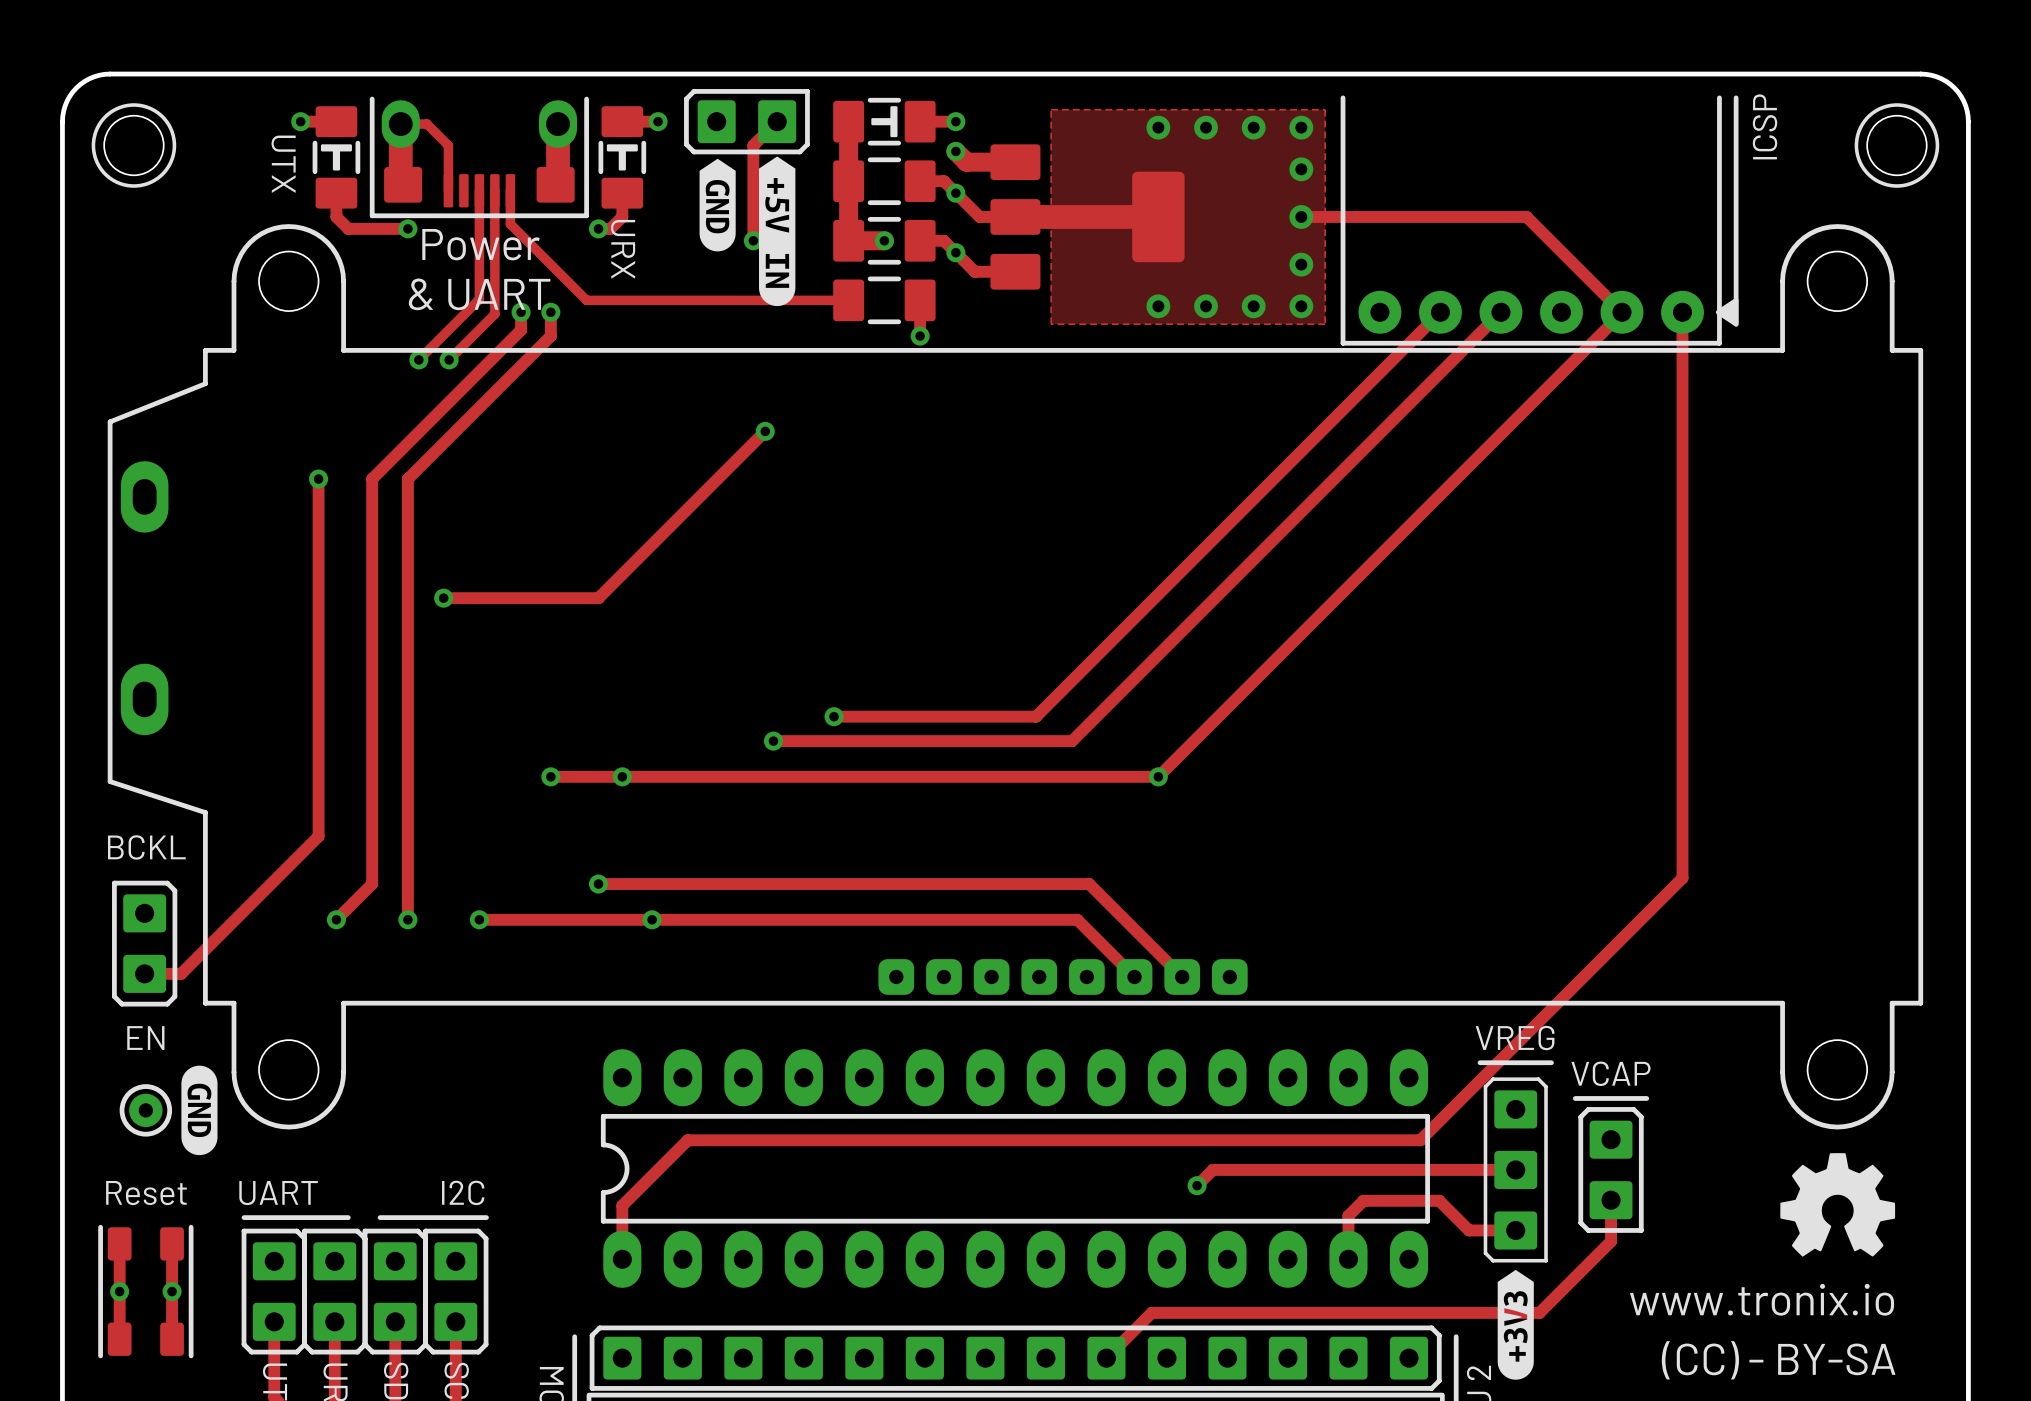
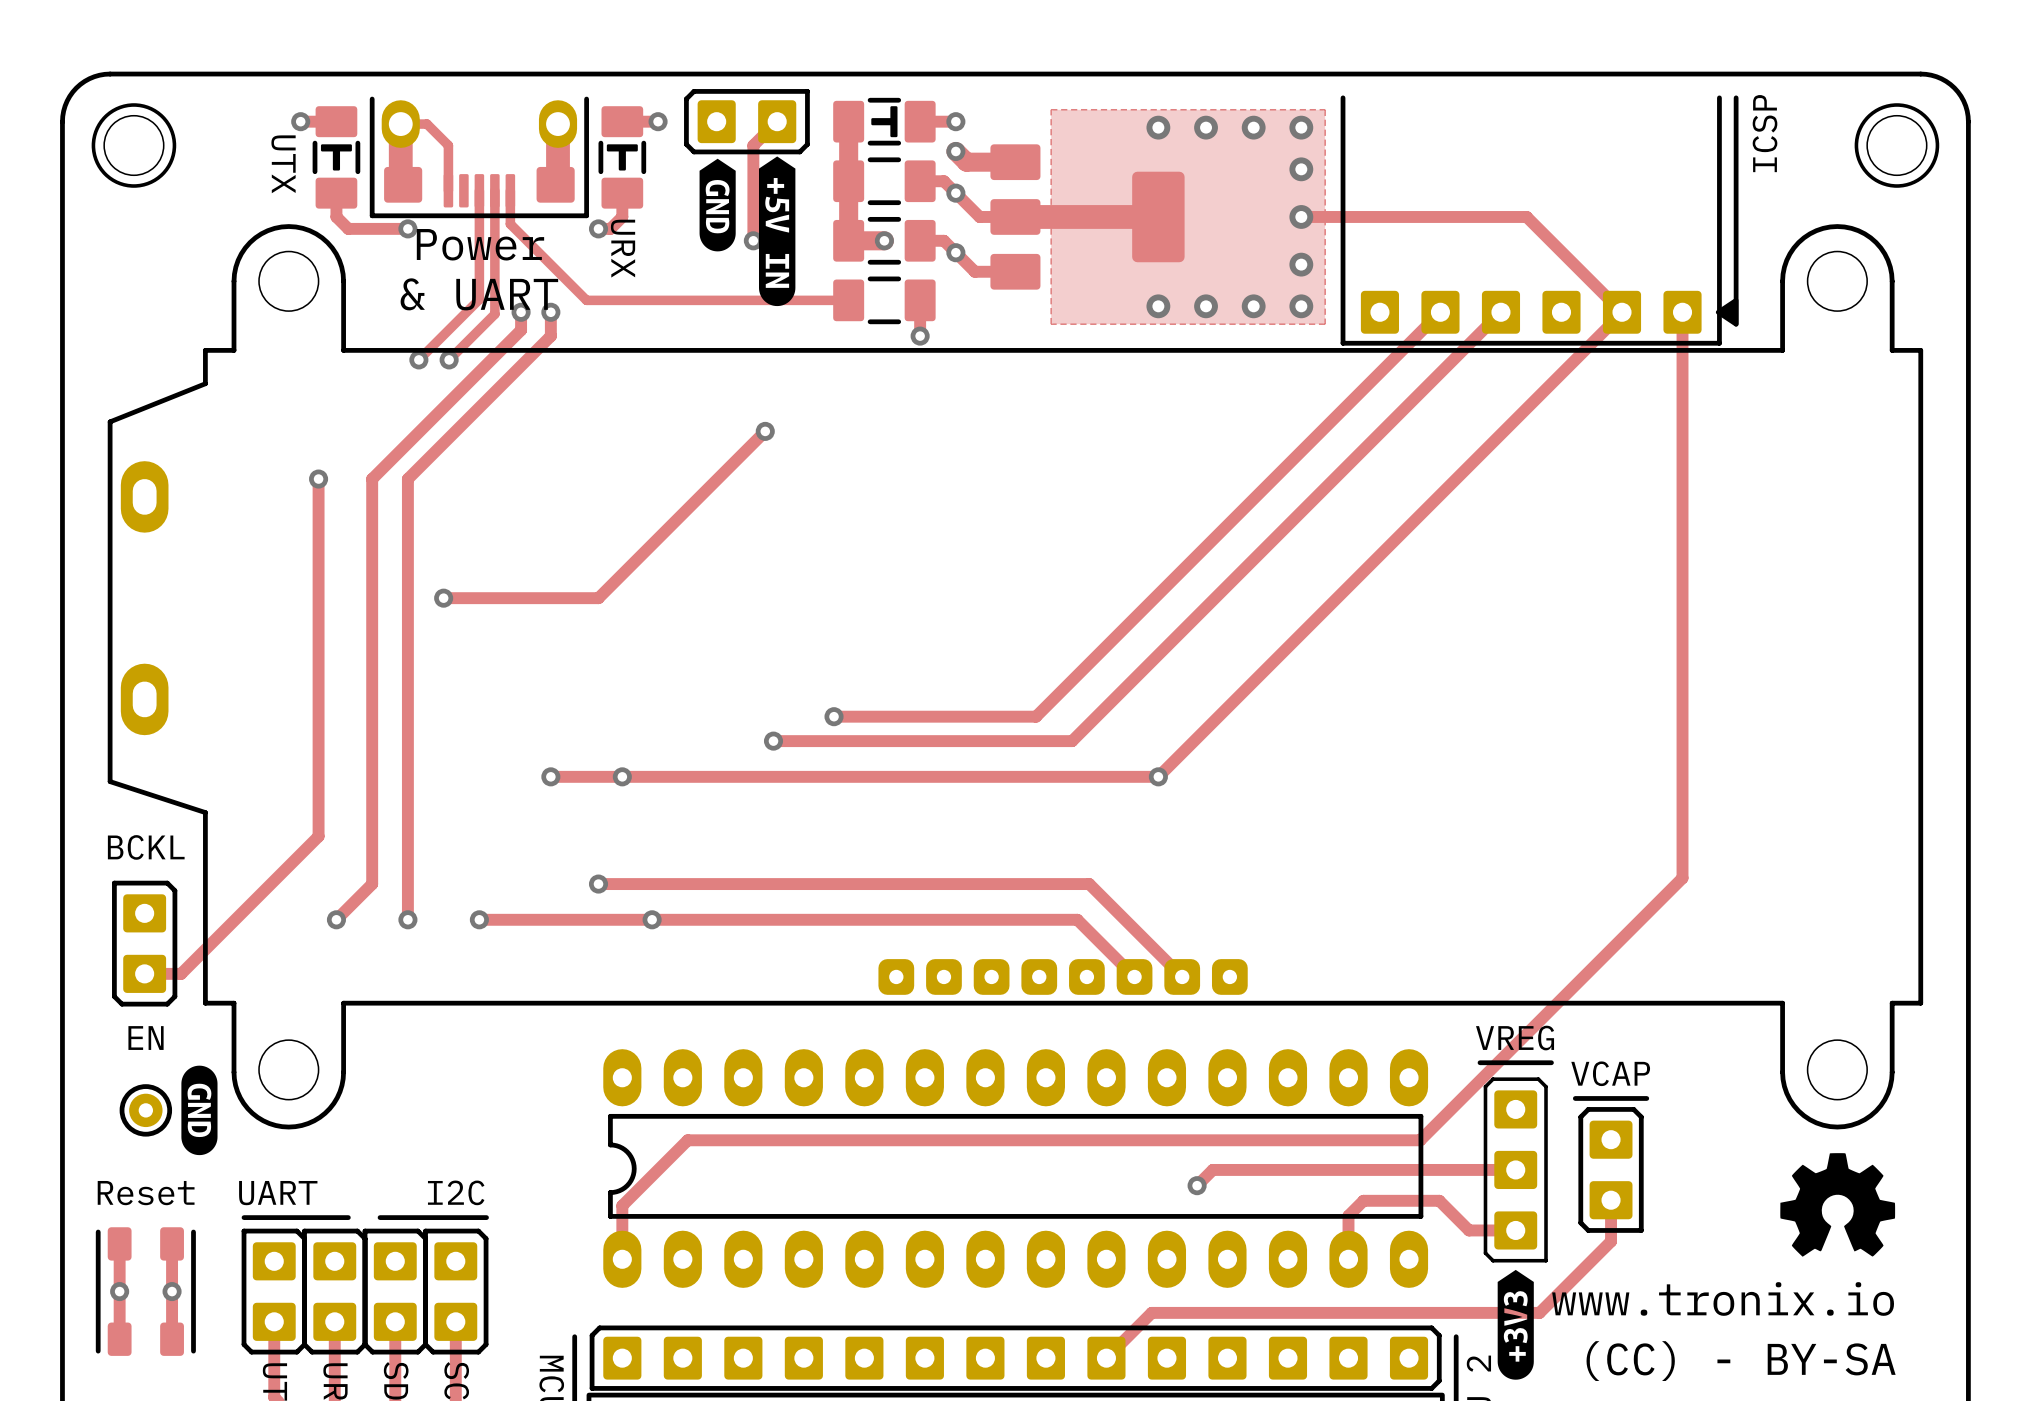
part footprint: [1340, 95, 1722, 346] -> [1340, 95, 1722, 346]
part footprint: [600, 1049, 1430, 1288] -> [603, 1049, 1429, 1288]
part footprint: [98, 1224, 194, 1359] -> [95, 1227, 196, 1356]

